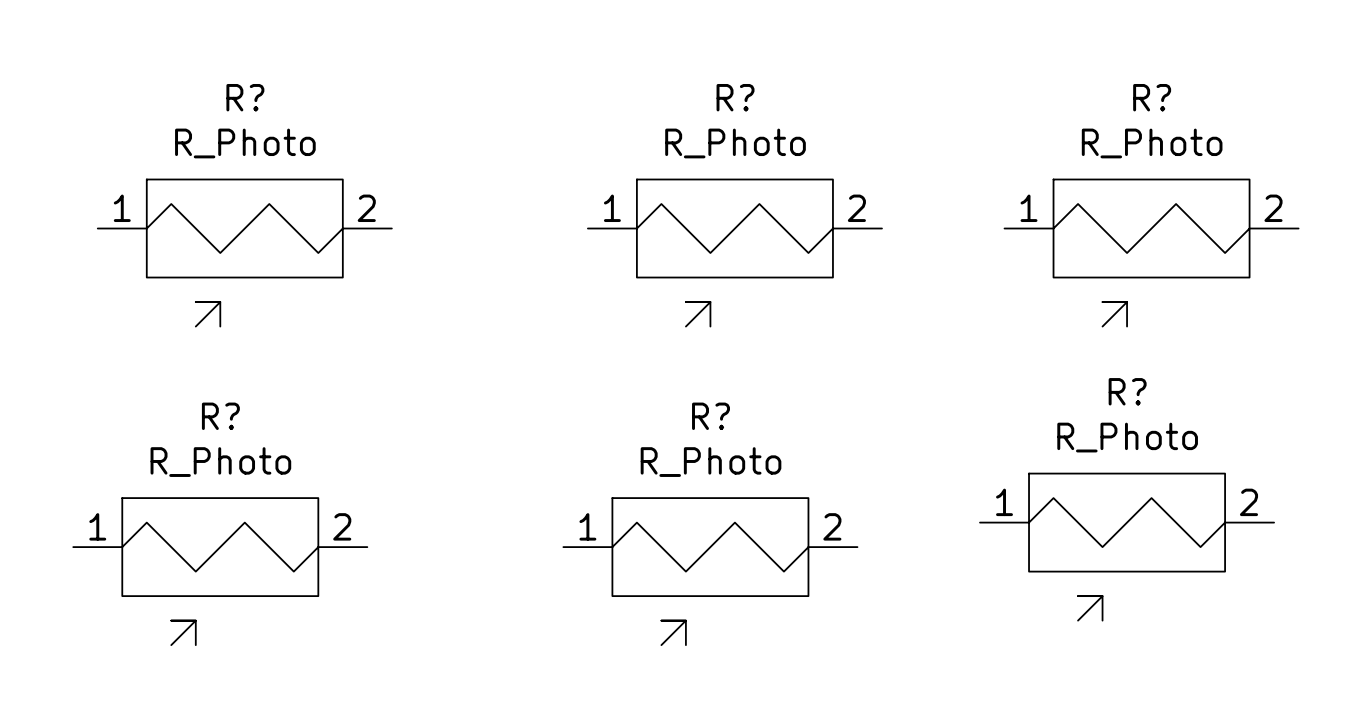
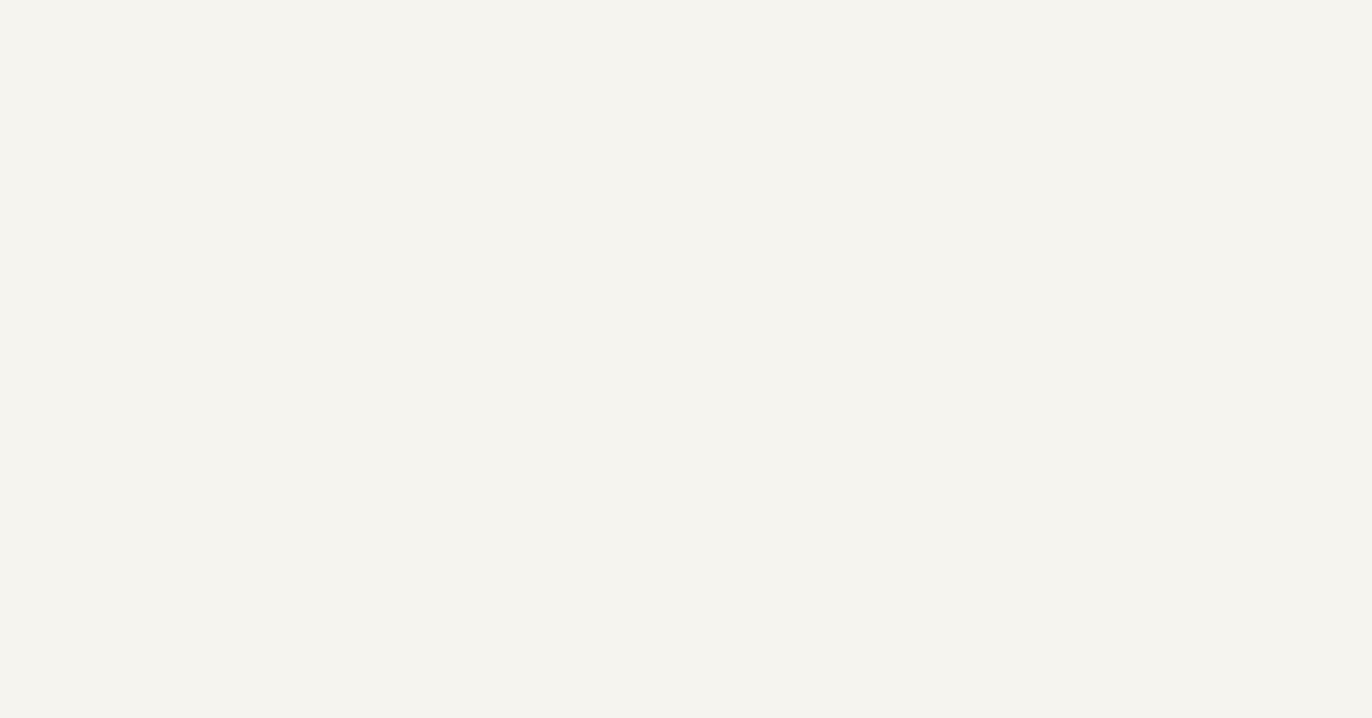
R?: R_Photo (244, 253) -> none
R?: R_Photo (734, 253) -> none
R?: R_Photo (1151, 253) -> none
R?: R_Photo (1127, 547) -> none
R?: R_Photo (220, 571) -> none
R?: R_Photo (710, 571) -> none

